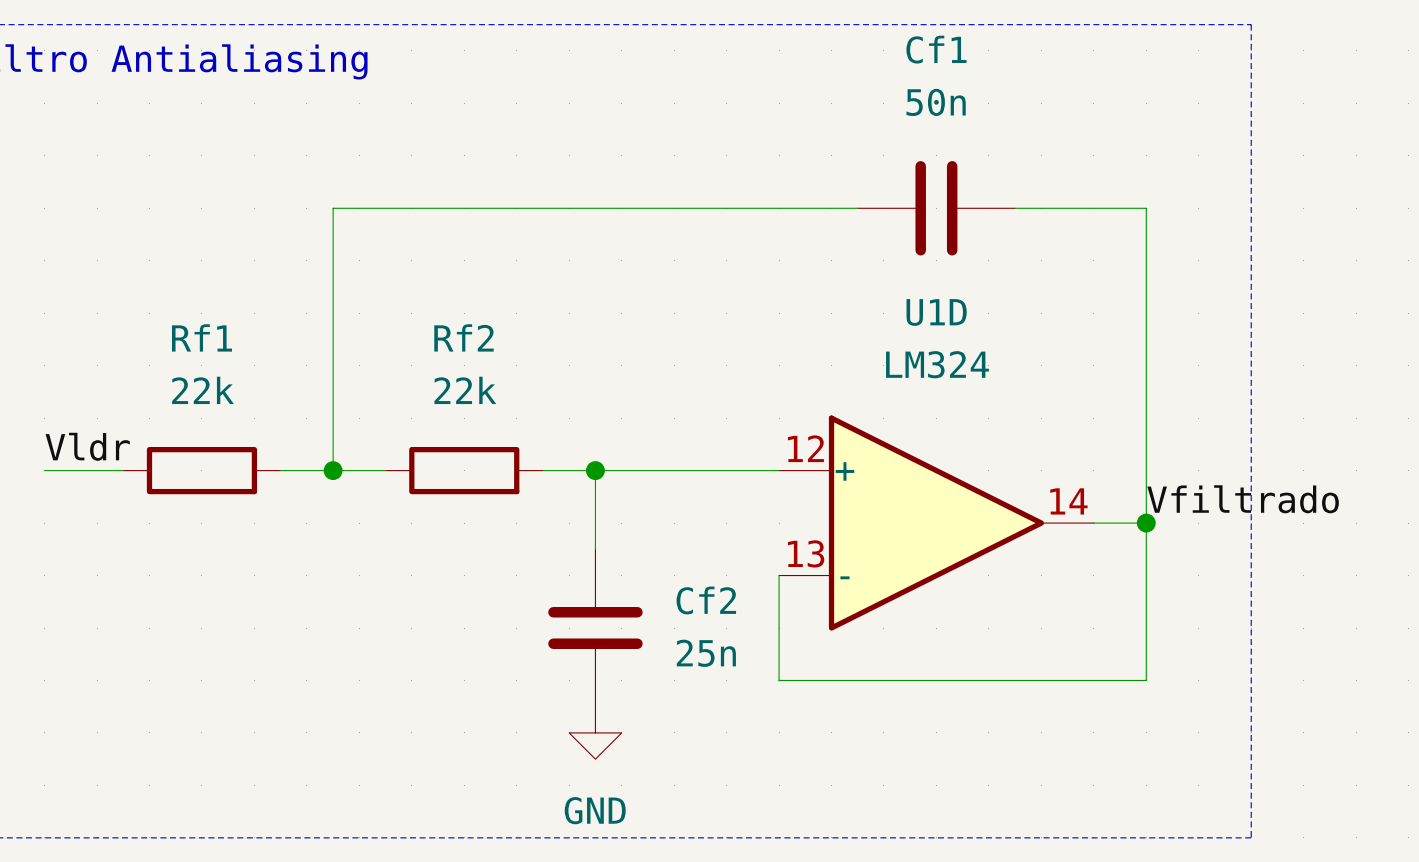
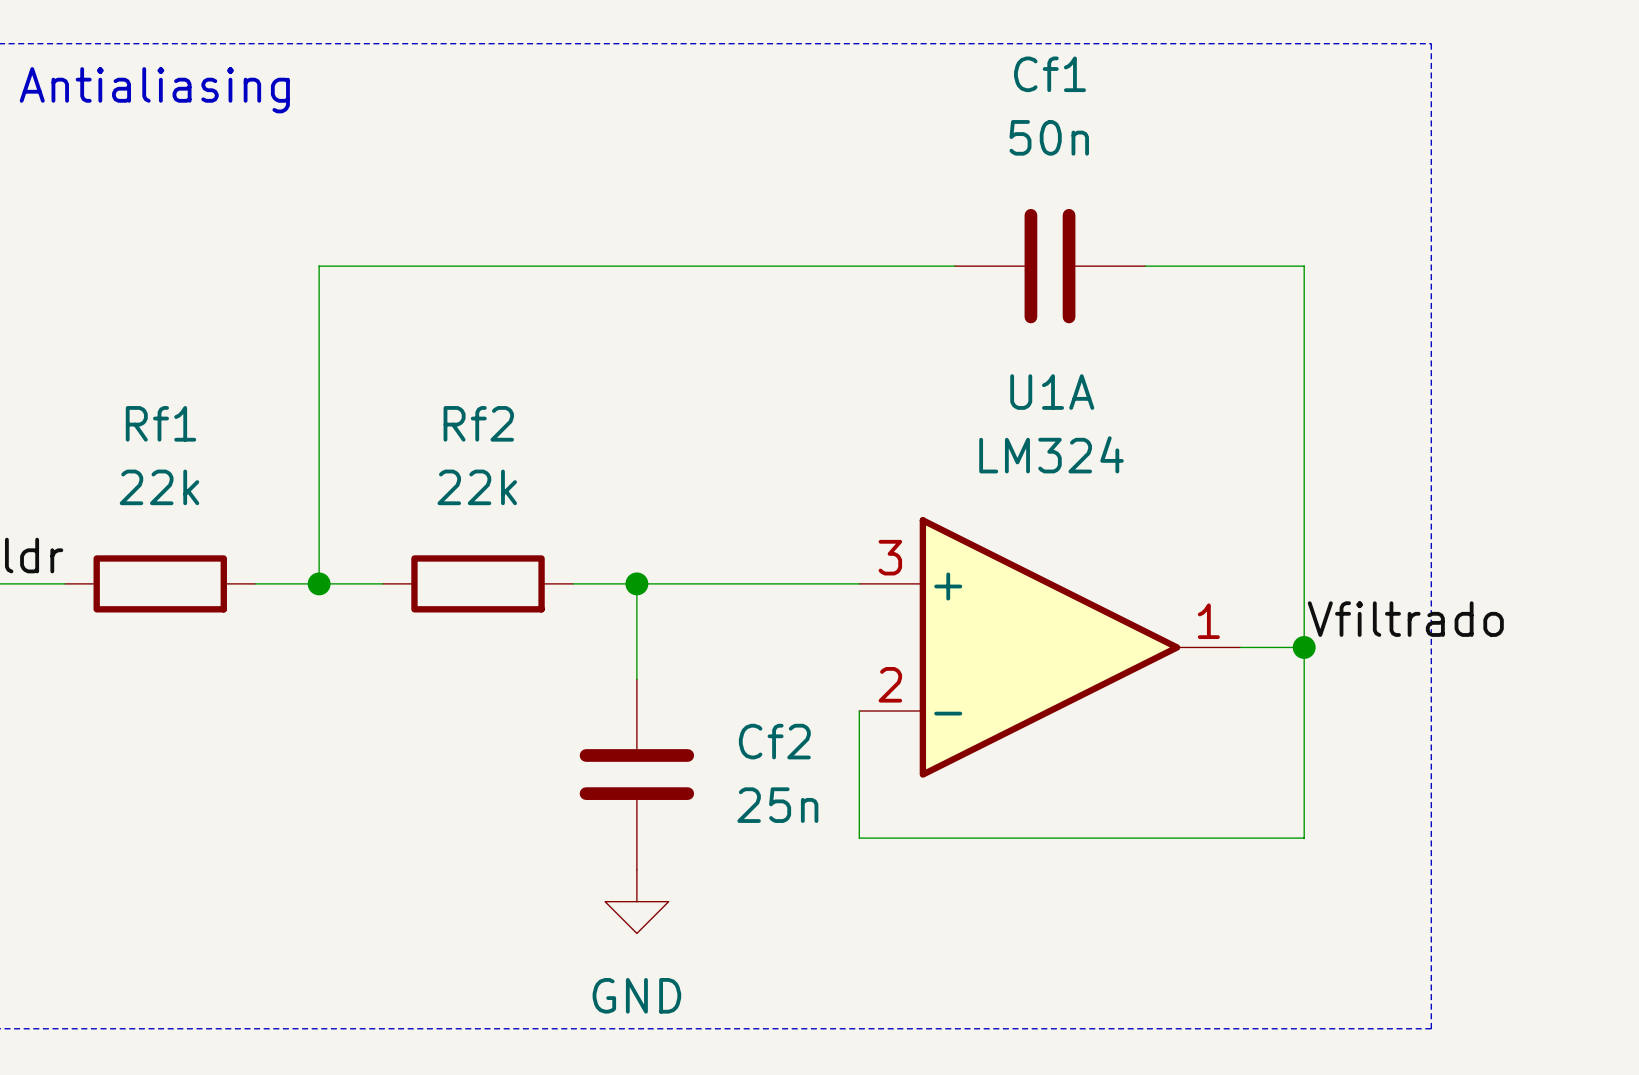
U1D name: U1D (936, 312) -> U1A (1052, 392)
U1D pin number: 12 (805, 448) -> 3 (890, 557)
U1D pin number: 14 (1068, 501) -> 1 (1208, 621)
U1D pin number: 13 (806, 553) -> 2 (890, 684)

